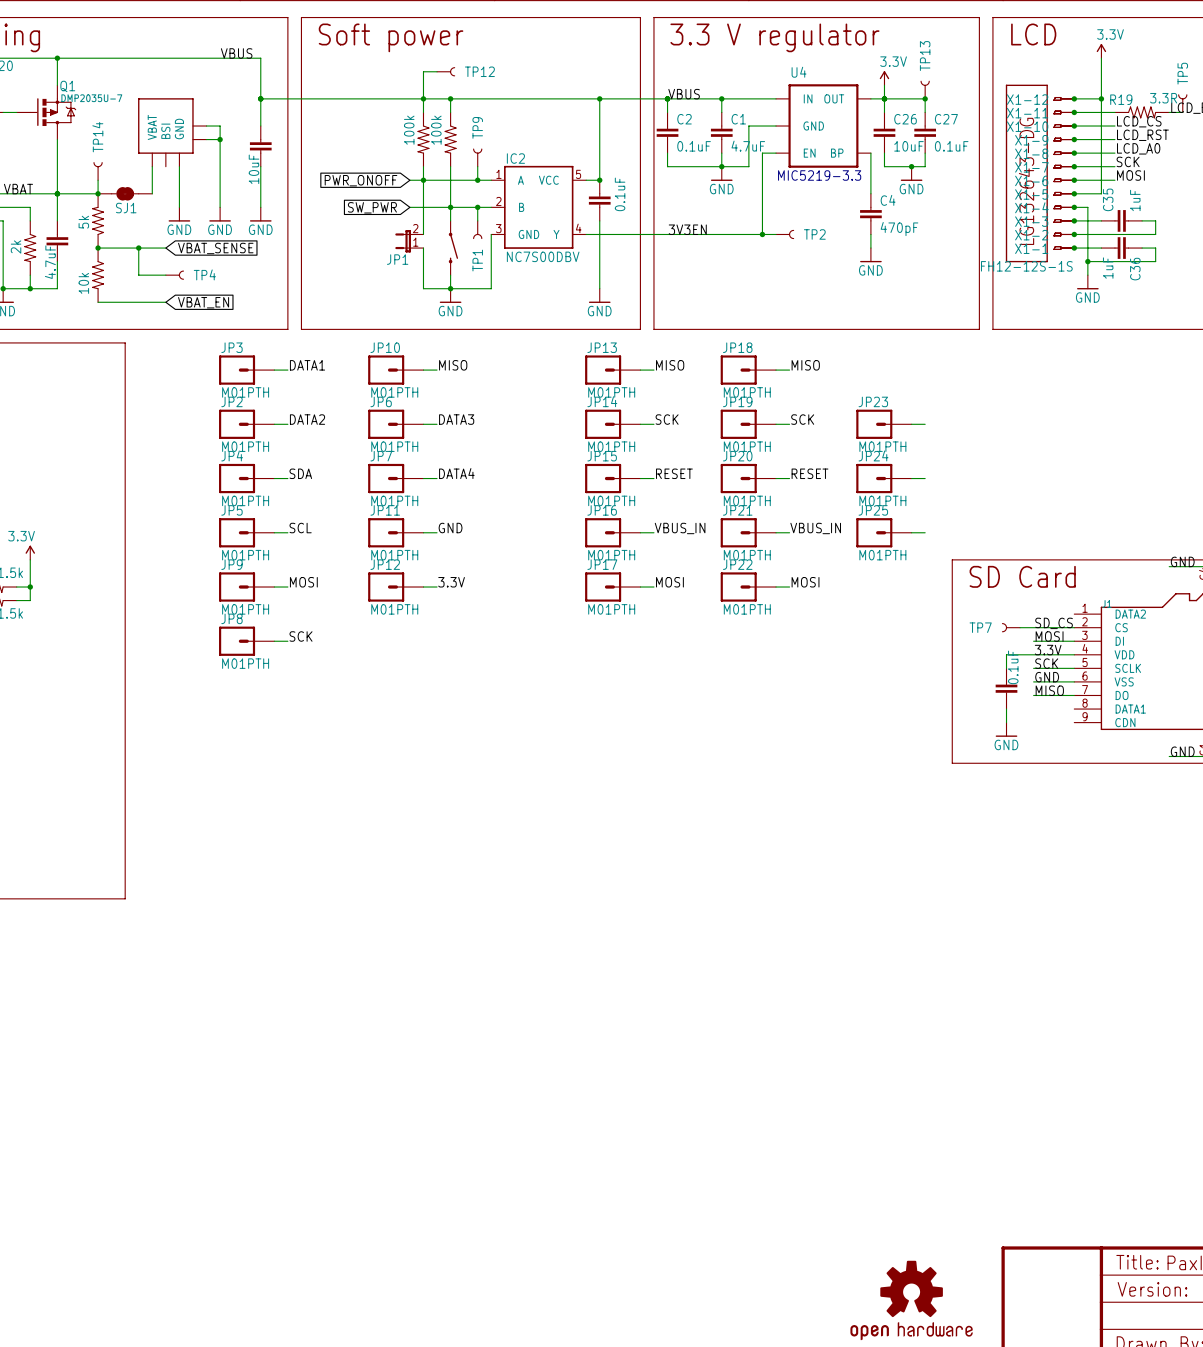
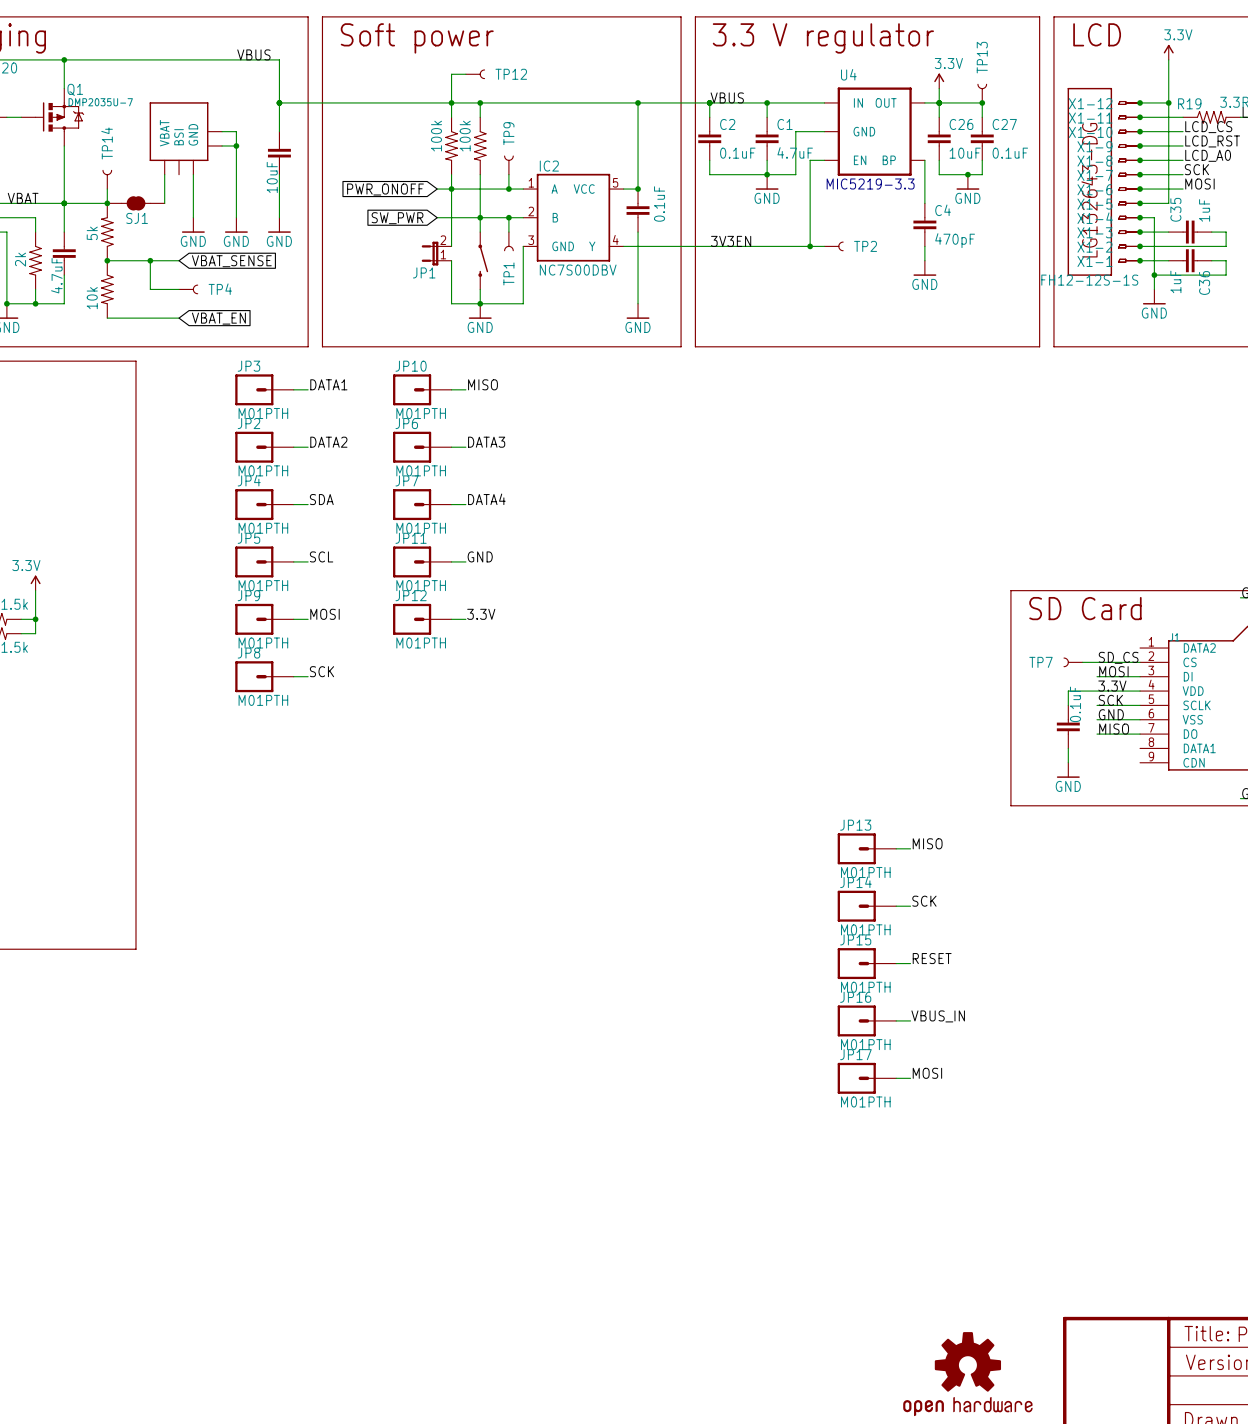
label: MISO (670, 365) -> none
label: MISO (805, 365) -> none
JP13 position: (612, 370) -> (866, 848)
wire: (640, 370) (653, 370) -> none
JP18: M01PTH (748, 370) -> none
wire: (776, 370) (789, 370) -> none
label: SCK (667, 419) -> none
label: SCK (802, 419) -> none
JP14 position: (612, 424) -> (866, 906)
wire: (640, 424) (653, 424) -> none
JP19: M01PTH (748, 424) -> none
wire: (776, 424) (789, 424) -> none
JP23: M01PTH (883, 424) -> none
wire: (911, 424) (925, 424) -> none
label: RESET (674, 473) -> none
label: RESET (810, 473) -> none
JP15 position: (612, 478) -> (866, 963)
wire: (640, 478) (653, 478) -> none
JP20: M01PTH (748, 478) -> none
wire: (776, 478) (789, 478) -> none
JP24: M01PTH (883, 478) -> none
wire: (911, 478) (925, 478) -> none
label: VBUS_IN (680, 528) -> none
label: VBUS_IN (815, 528) -> none
JP16 position: (612, 532) -> (866, 1020)
wire: (640, 532) (653, 532) -> none
JP21: M01PTH (748, 532) -> none
wire: (776, 532) (789, 532) -> none
JP25: M01PTH (883, 532) -> none
wire: (911, 532) (925, 532) -> none
label: MOSI (669, 582) -> none
label: MOSI (805, 582) -> none
JP17 position: (612, 587) -> (866, 1078)
wire: (640, 587) (653, 587) -> none
JP22: M01PTH (748, 587) -> none
wire: (776, 587) (789, 587) -> none
label: none -> MISO (927, 843)
wire: none -> (896, 848) (910, 848)
label: none -> SCK (924, 901)
wire: none -> (896, 906) (910, 906)
label: none -> RESET (932, 958)
wire: none -> (896, 963) (910, 963)
label: none -> VBUS_IN (938, 1016)
wire: none -> (896, 1020) (910, 1020)
label: none -> MOSI (927, 1073)
wire: none -> (896, 1078) (910, 1078)

